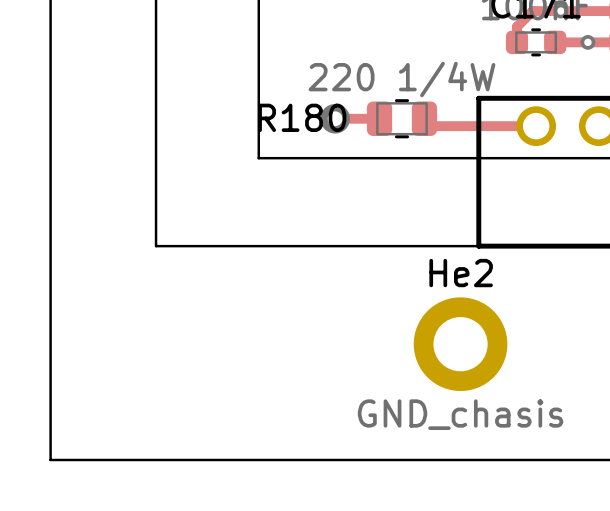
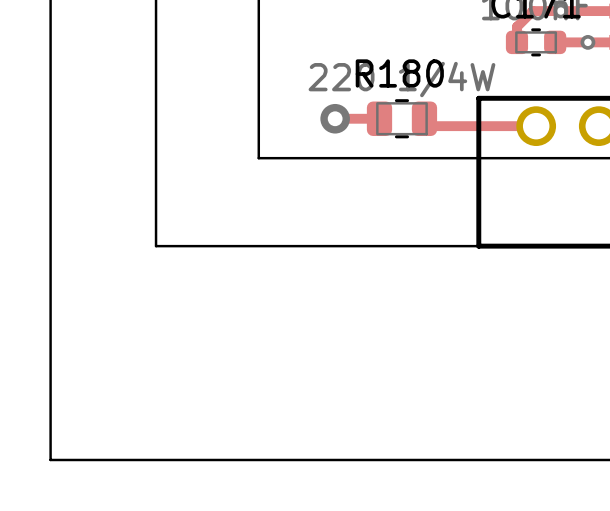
R180 name position: R180 (302, 117) -> R180 (399, 73)
He2: GND_chasis (460, 344) -> none

